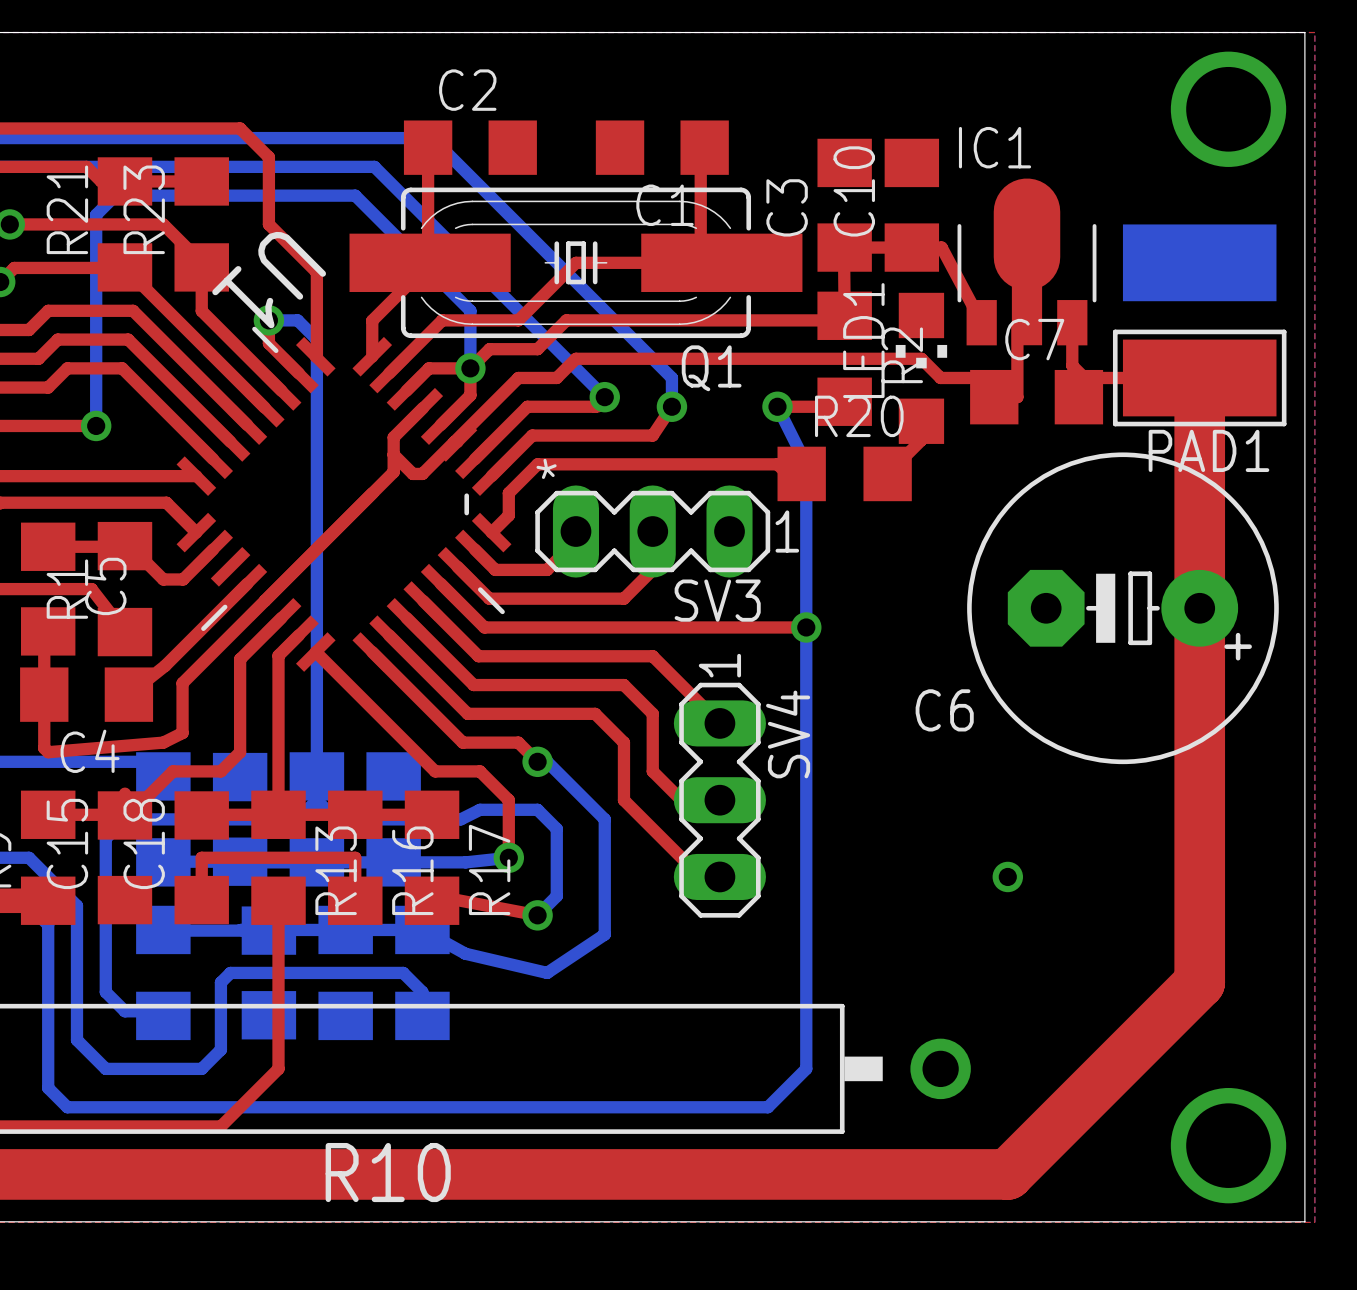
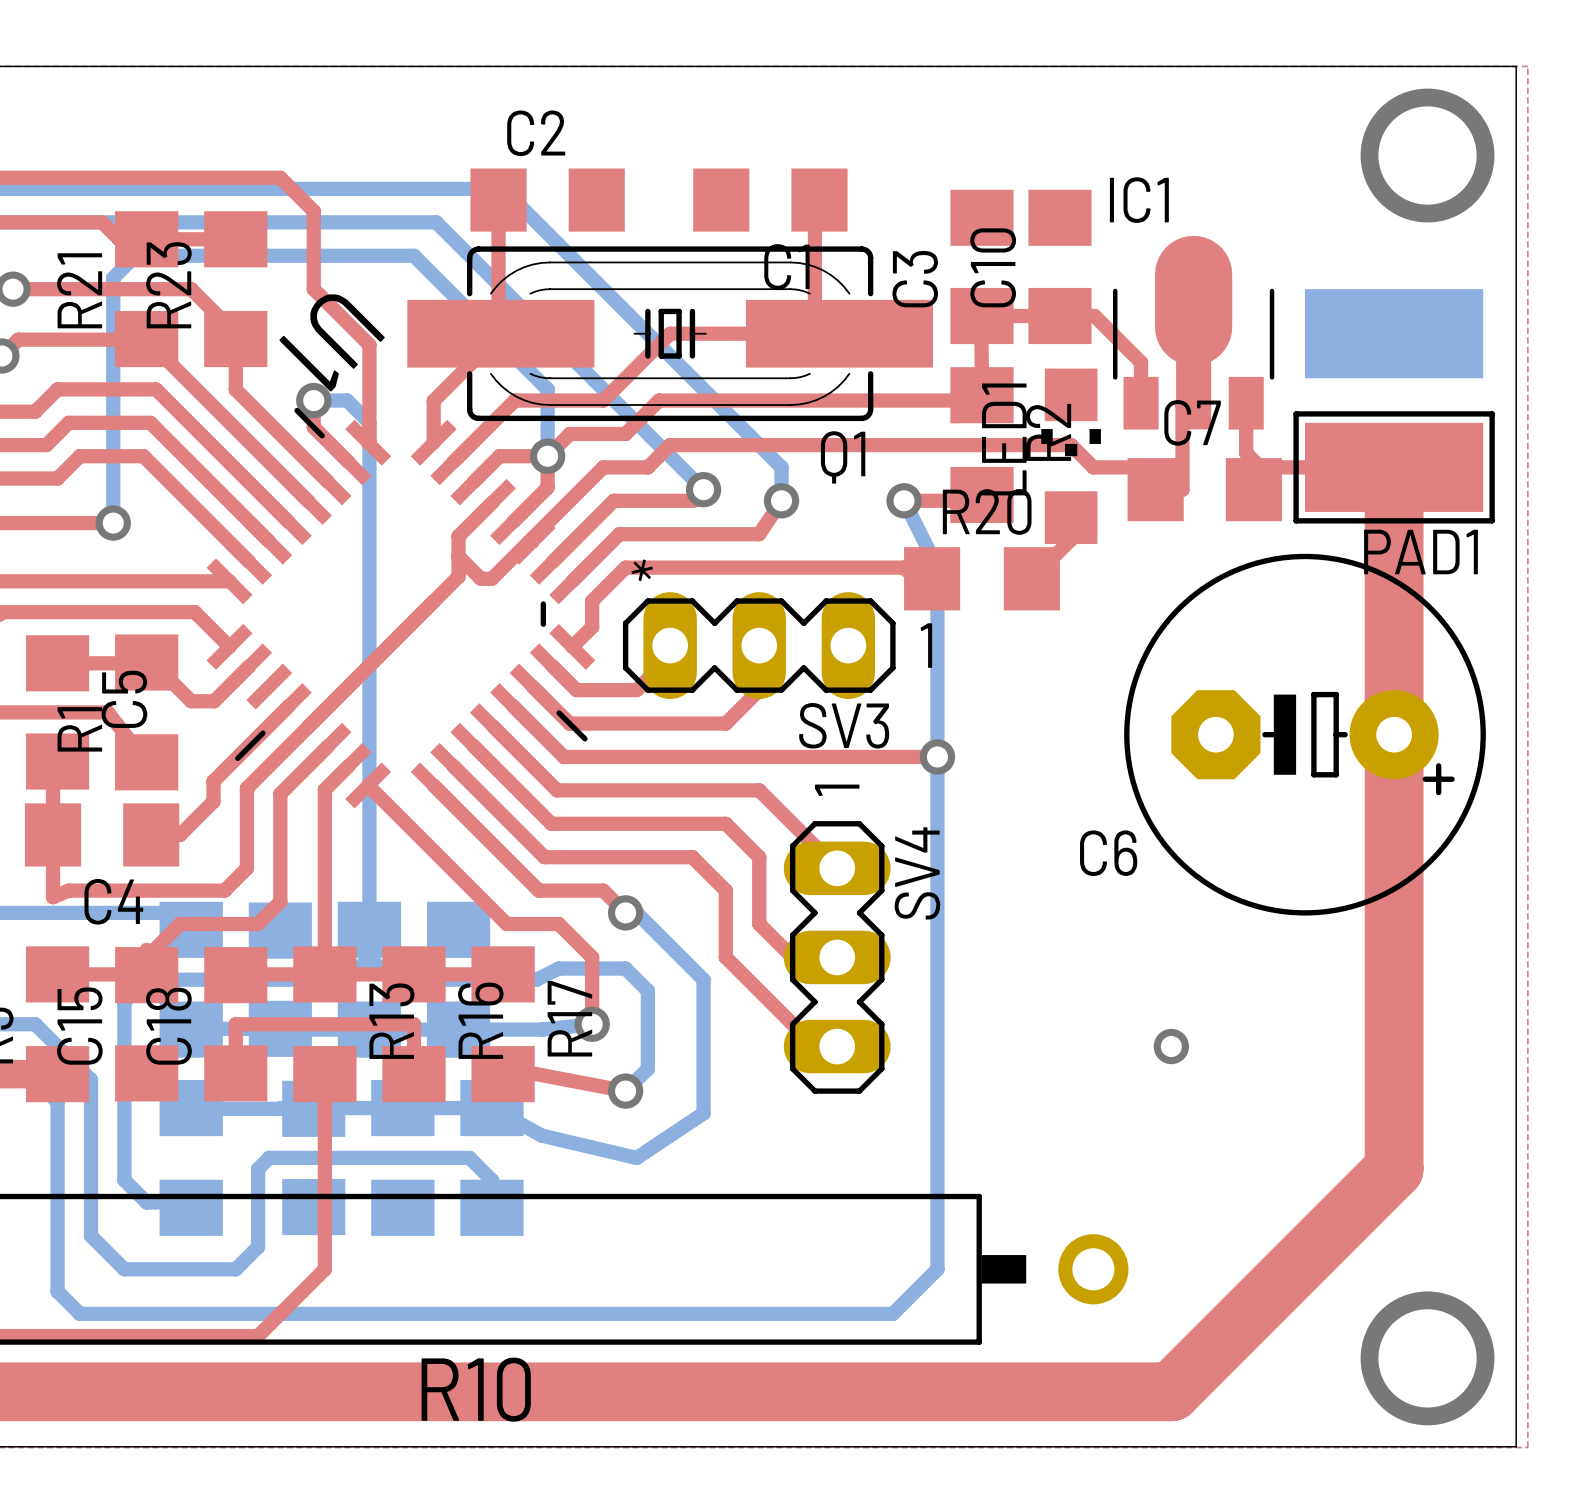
top track: (941, 247) (981, 322) -> (1094, 316) (1141, 362) (1141, 403)
top track: (182, 648) (165, 665) (128, 694) -> (213, 781) (213, 801) (180, 834) (151, 834)
top track: (211, 654) (182, 683) (182, 733) (163, 742) (48, 752) (44, 748) -> (246, 788) (246, 868) (224, 890) (68, 890) (53, 897)
top track: (172, 771) (144, 800) (124, 800) -> (202, 924) (180, 924) (146, 957)

